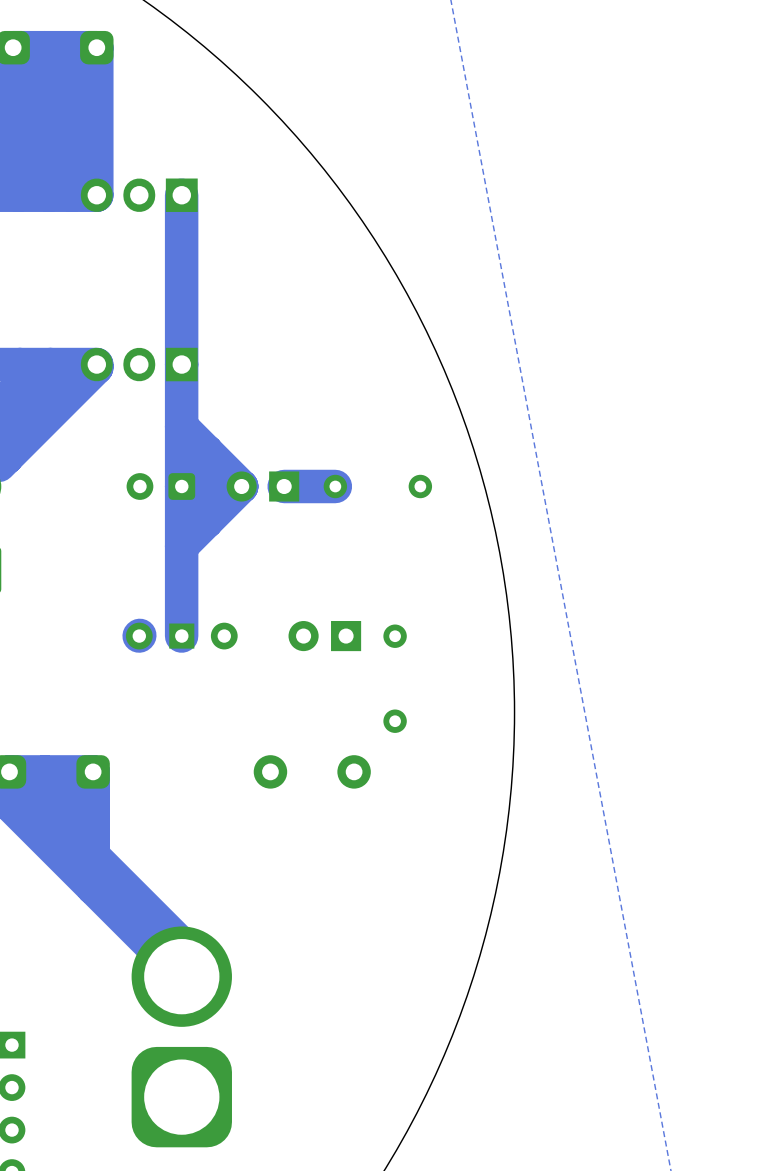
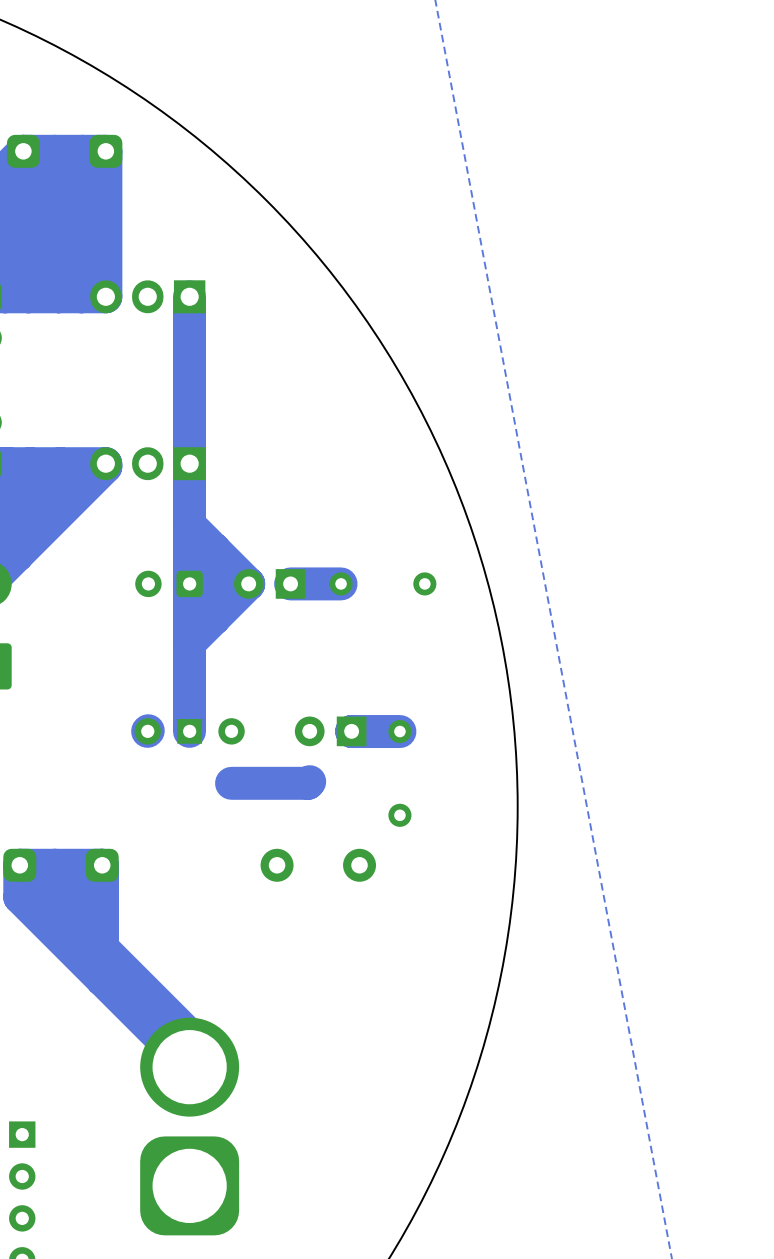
track: none -> (399, 731) (351, 731)
track: none -> (309, 781) (308, 783) (231, 783)

